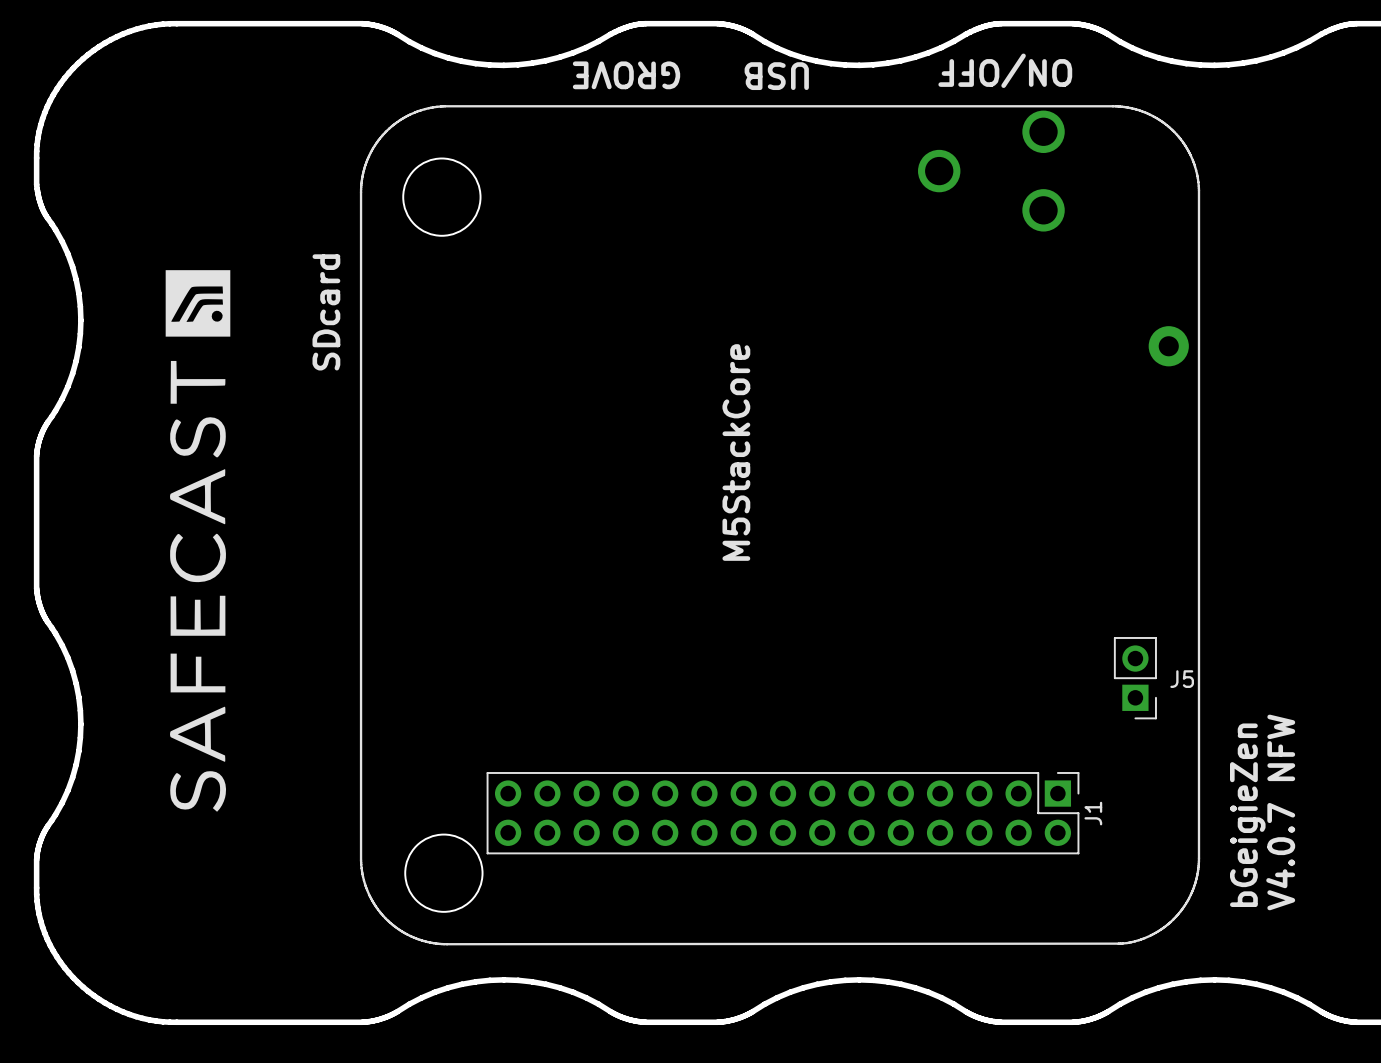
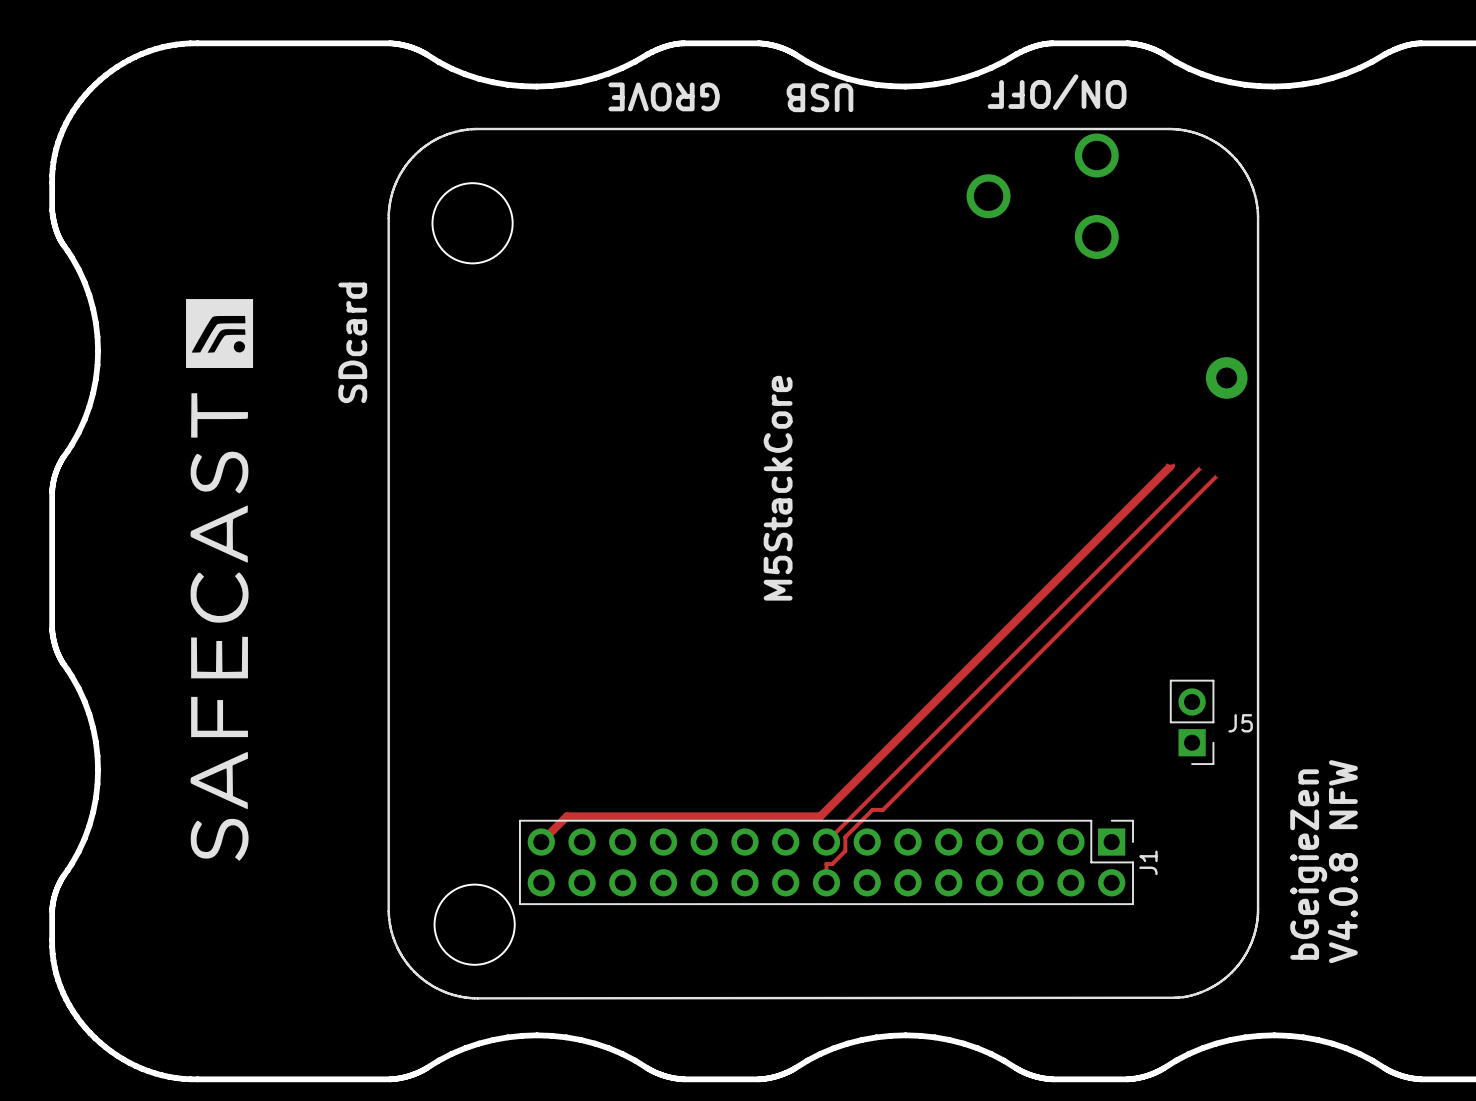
track: none -> (1170, 458) (1170, 466) (820, 816) (566, 816) (541, 842)
via: none -> (1170, 458)
track: none -> (1202, 466) (826, 842)
via: none -> (1202, 466)
track: none -> (1218, 474) (883, 809) (872, 809) (845, 837) (845, 850) (832, 863) (826, 863) (826, 882)
via: none -> (1218, 474)
text: V4.0.7 NFW (1280, 812) -> V4.0.8 NFW (1342, 861)

